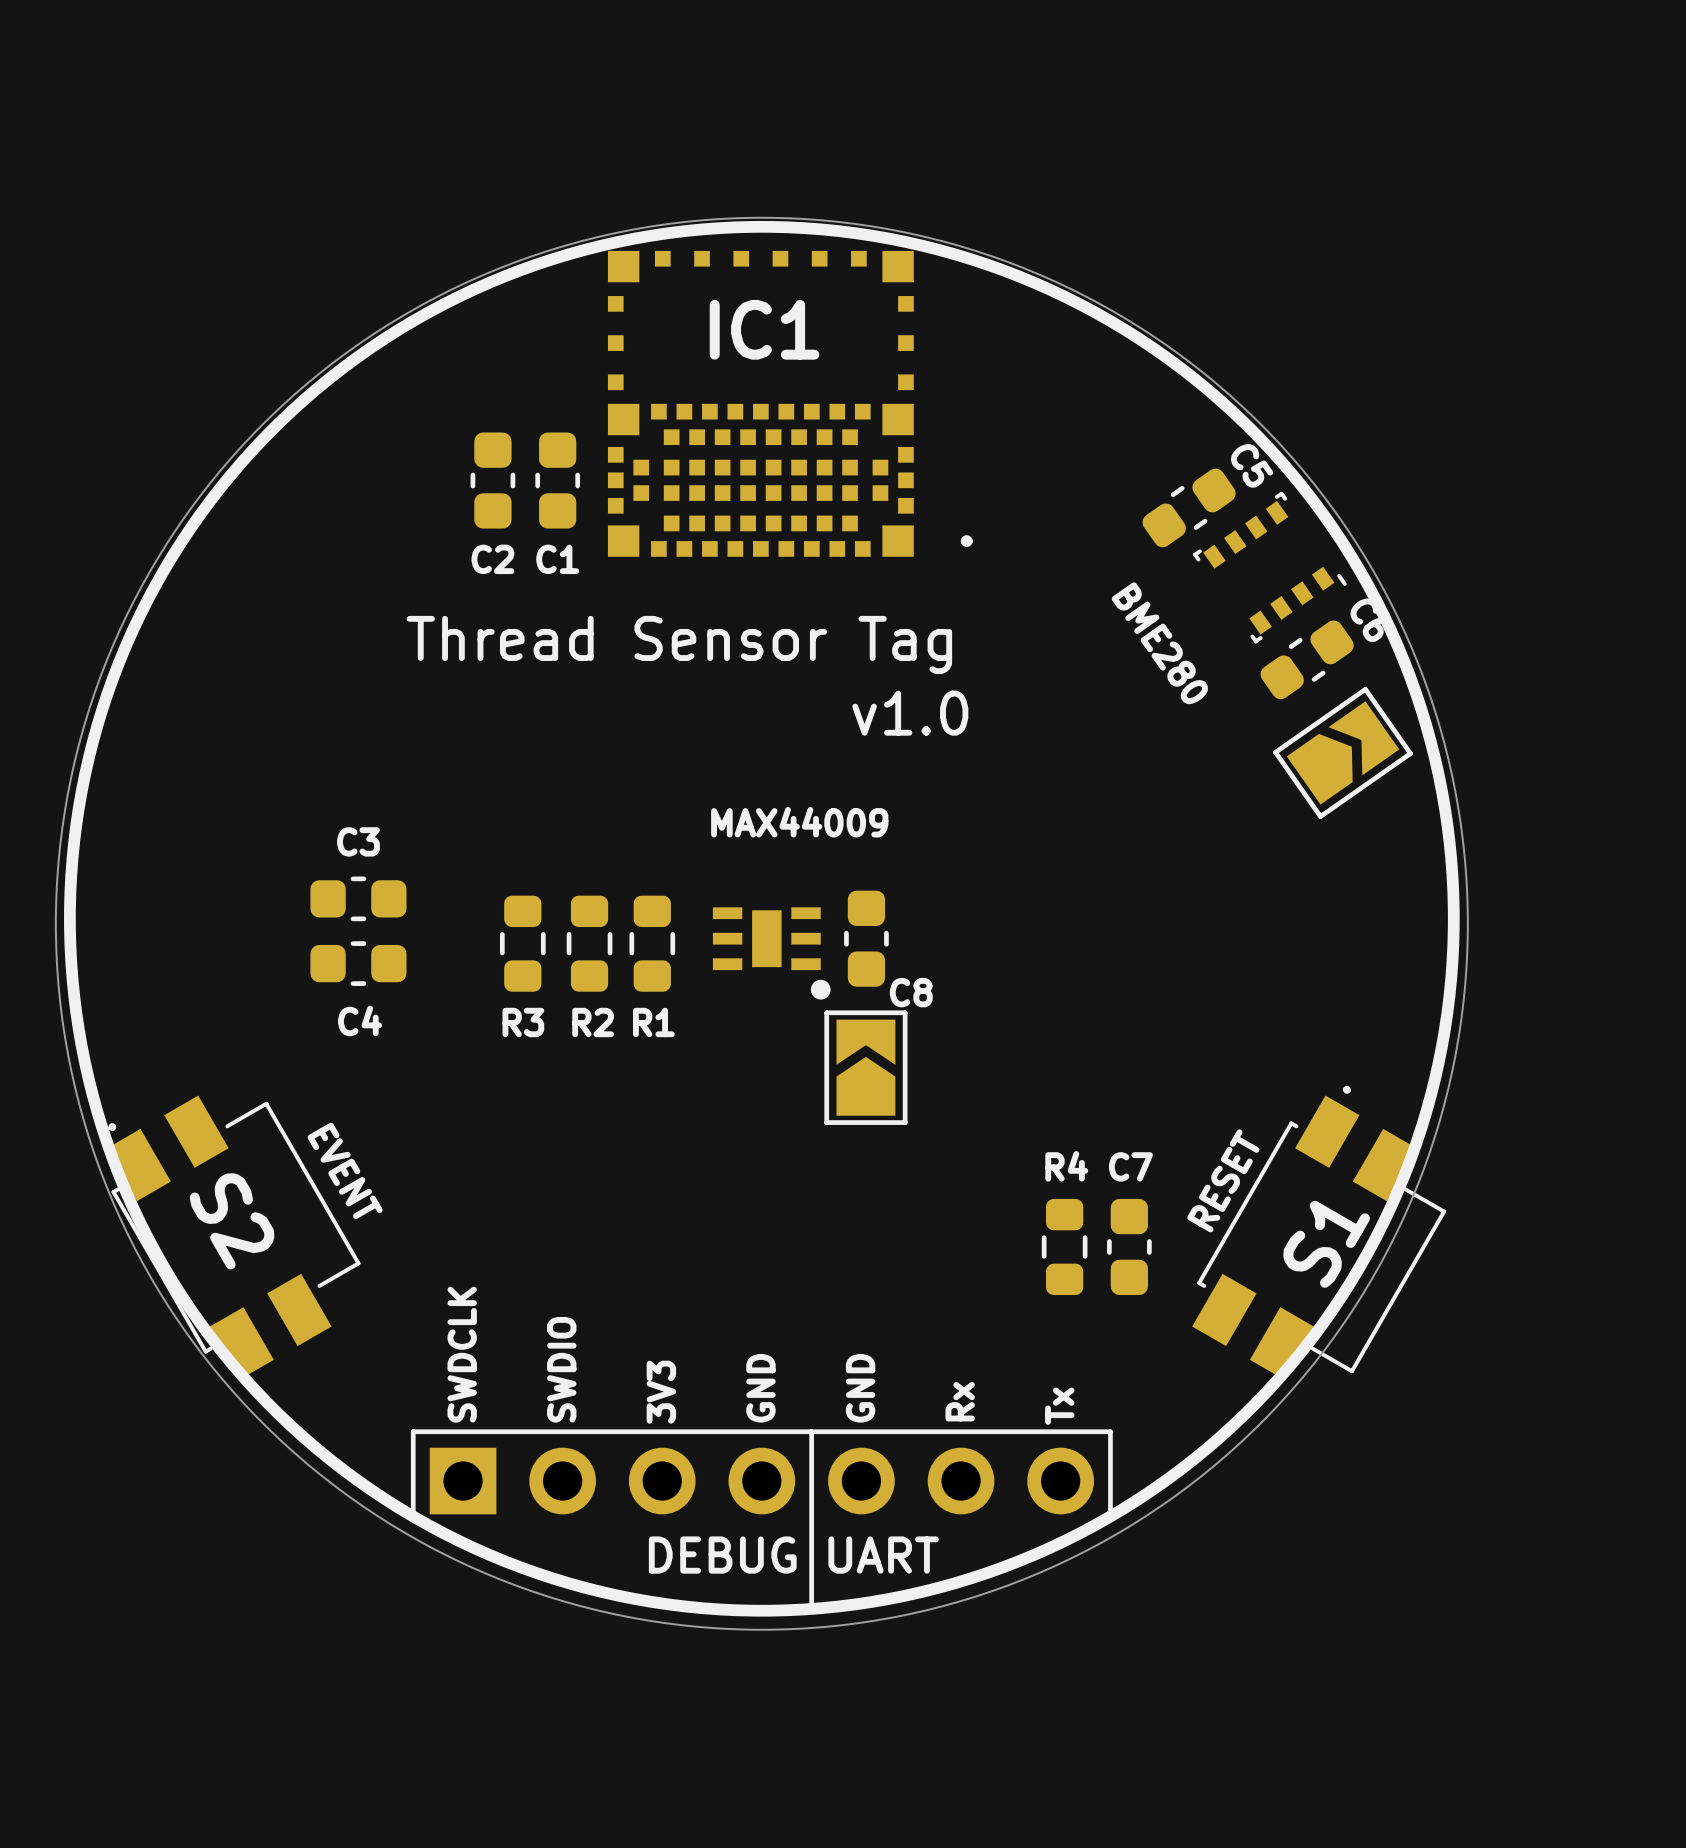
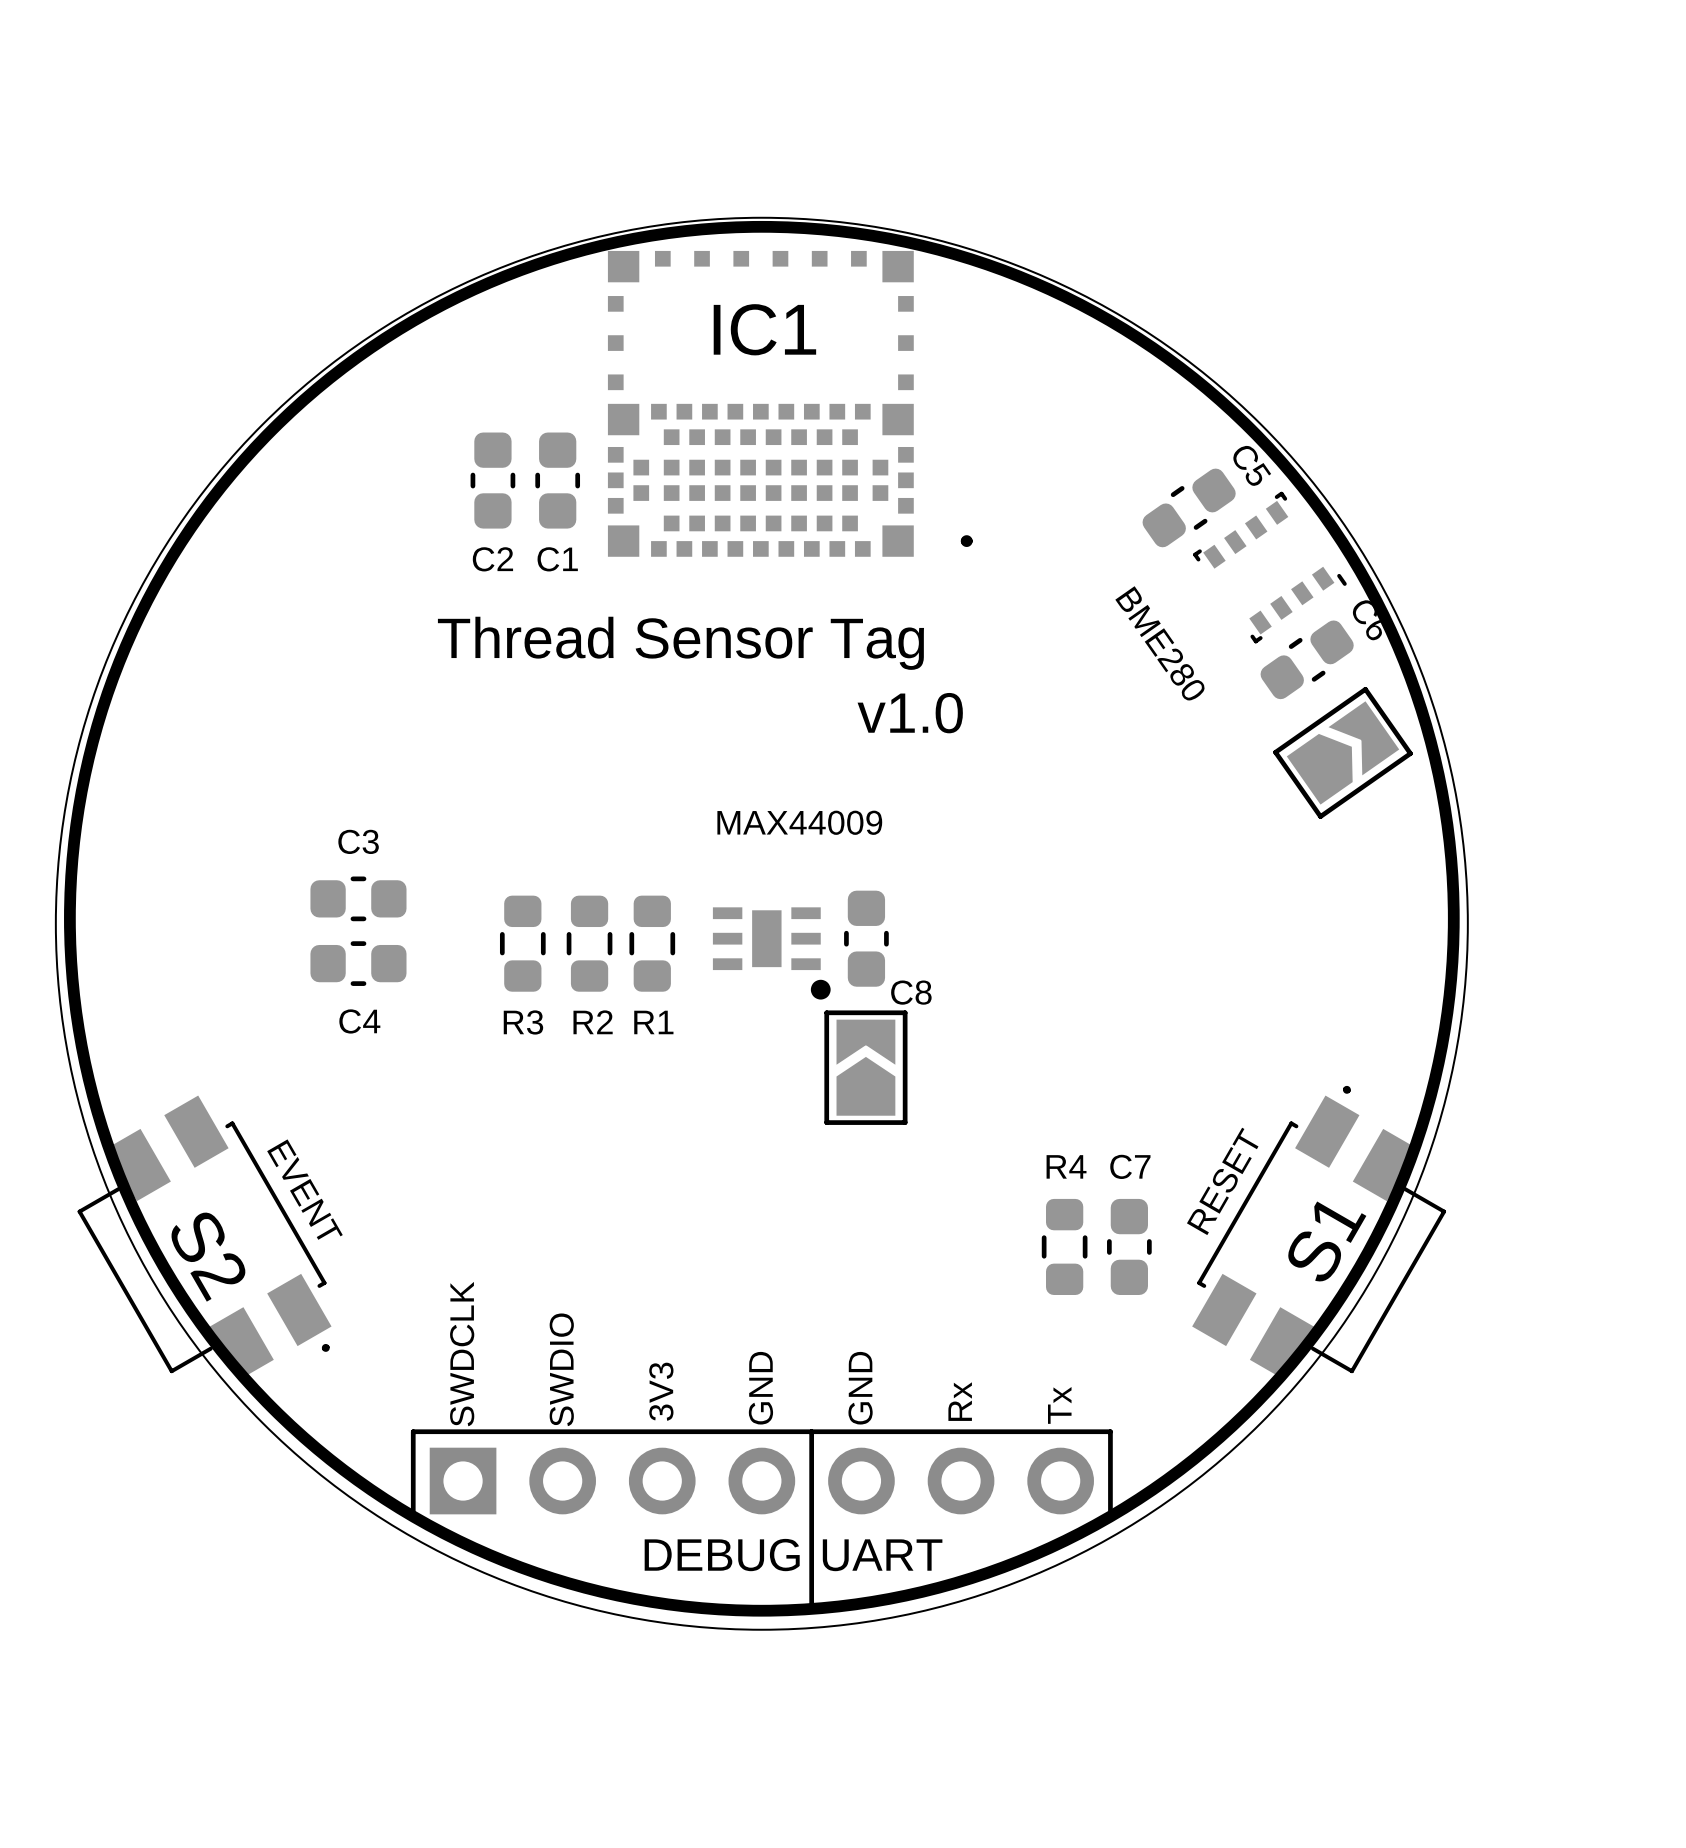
text position: EVENT (345, 1170) -> EVENT (304, 1189)
S2 rotation: 0° (233, 1237) -> 180° (204, 1237)

